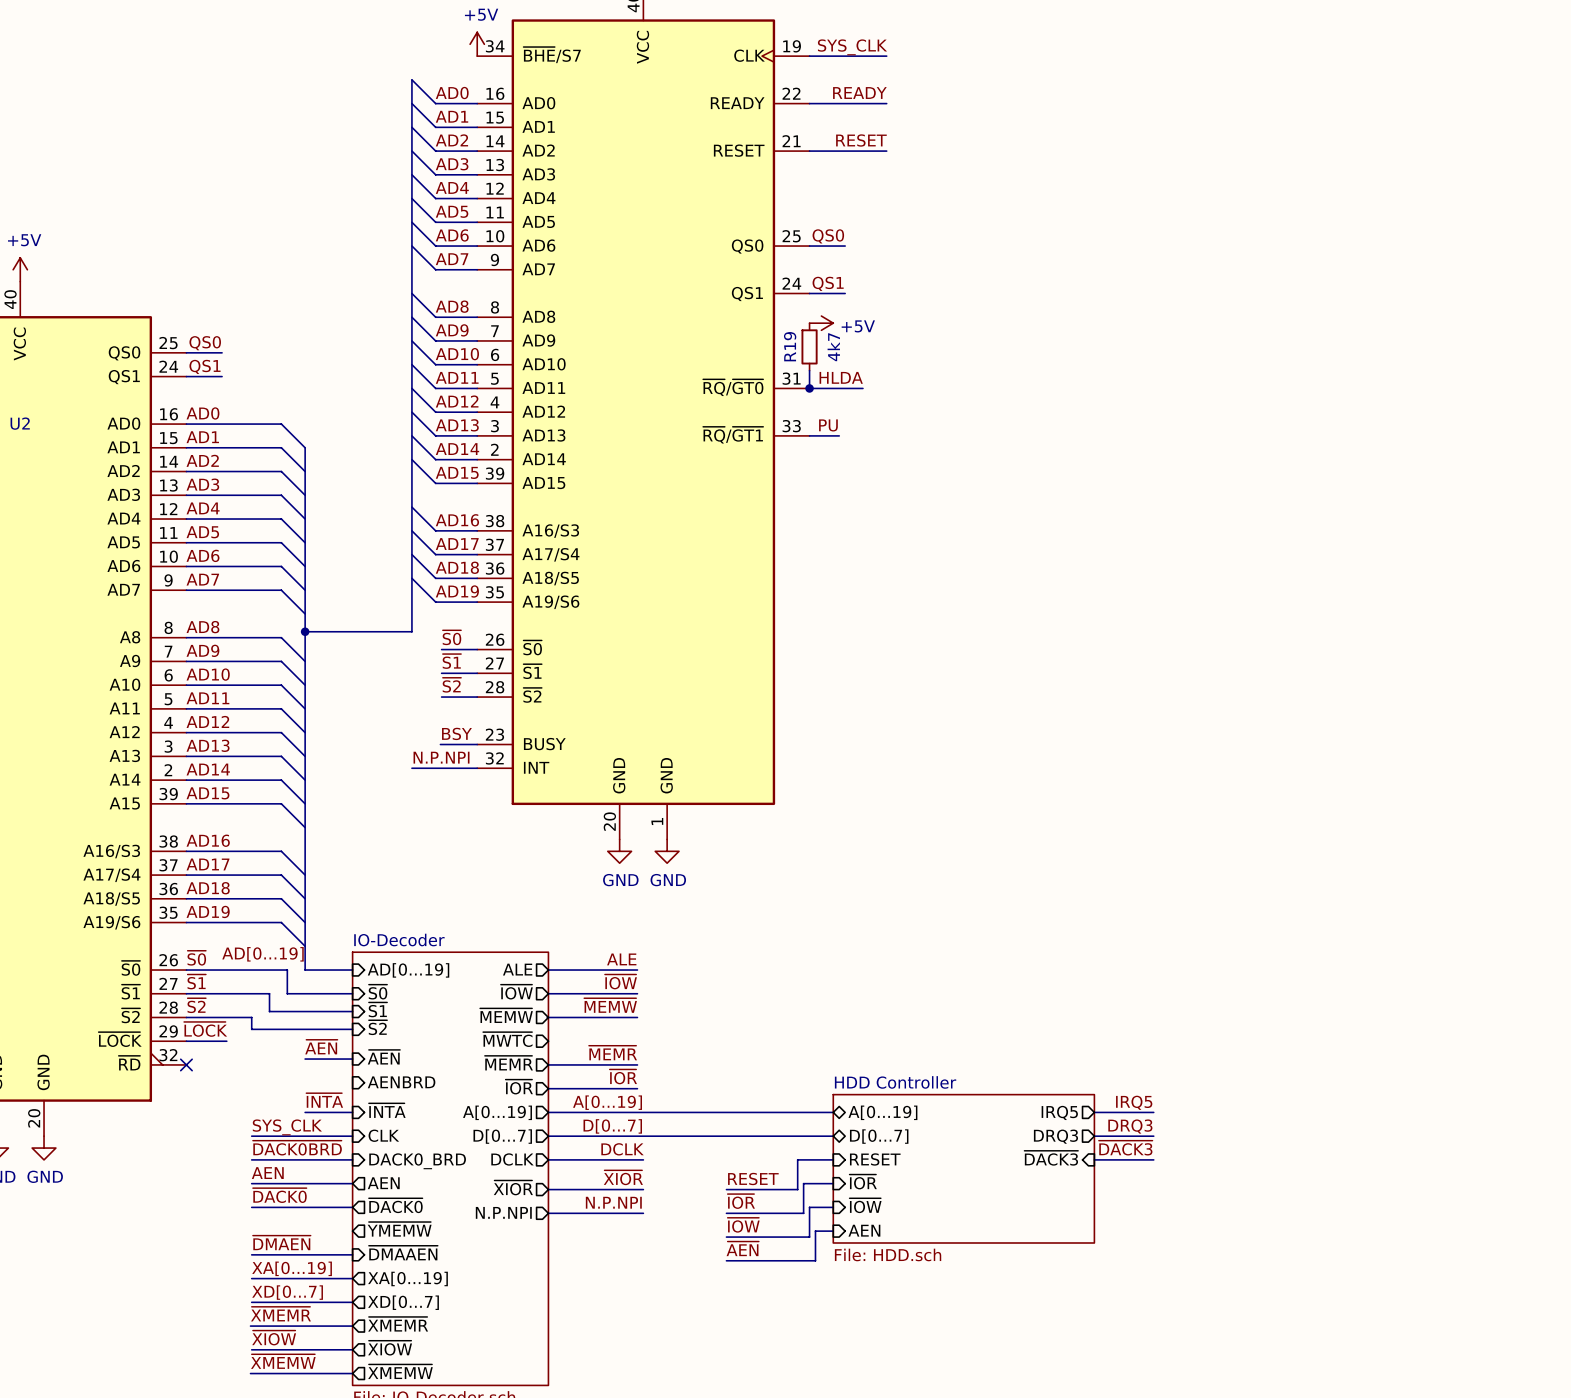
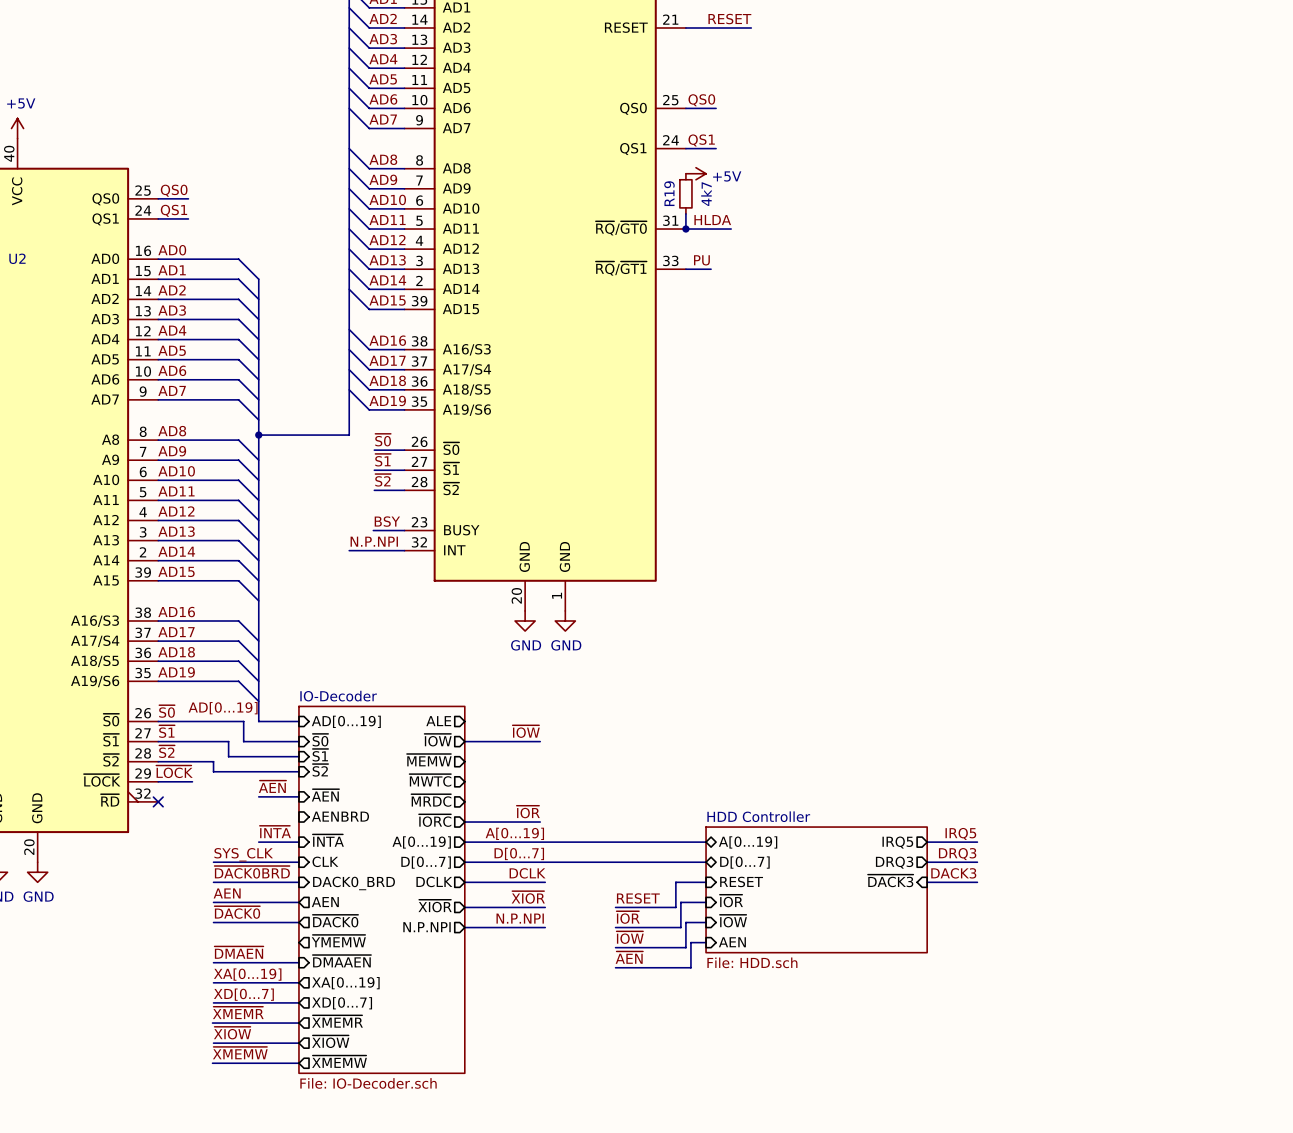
label: ALE (621, 959) -> none
wire: (548, 970) (637, 970) -> none
label: ~{MEMW} (610, 1005) -> none
wire: (547, 1017) (637, 1017) -> none
label: ~{MEMR} (612, 1053) -> none
sheet pin: ~{MEMR} (508, 1063) -> ~{MRDC} (431, 800)
wire: (548, 1064) (637, 1064) -> none
sheet pin: ~{IOR} (519, 1087) -> ~{IORC} (435, 820)
label: ~{DACK3} (1125, 1148) -> DACK3 (953, 873)

